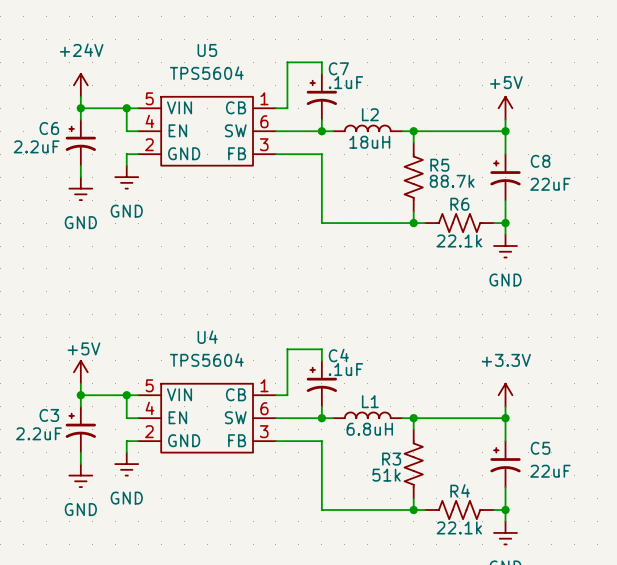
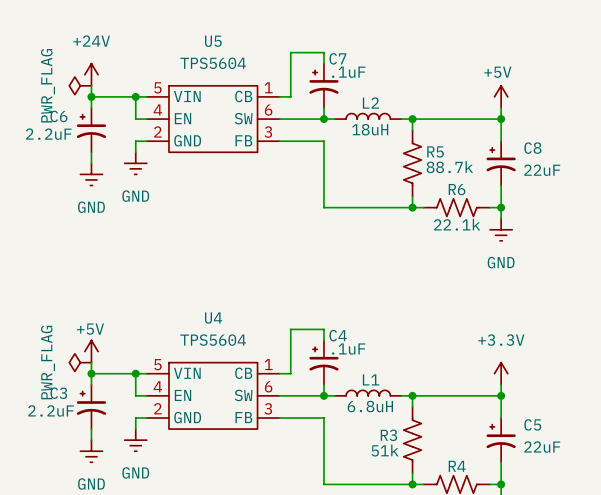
power symbol: none -> PWR_FLAG (80, 85)
power symbol: none -> PWR_FLAG (80, 362)

